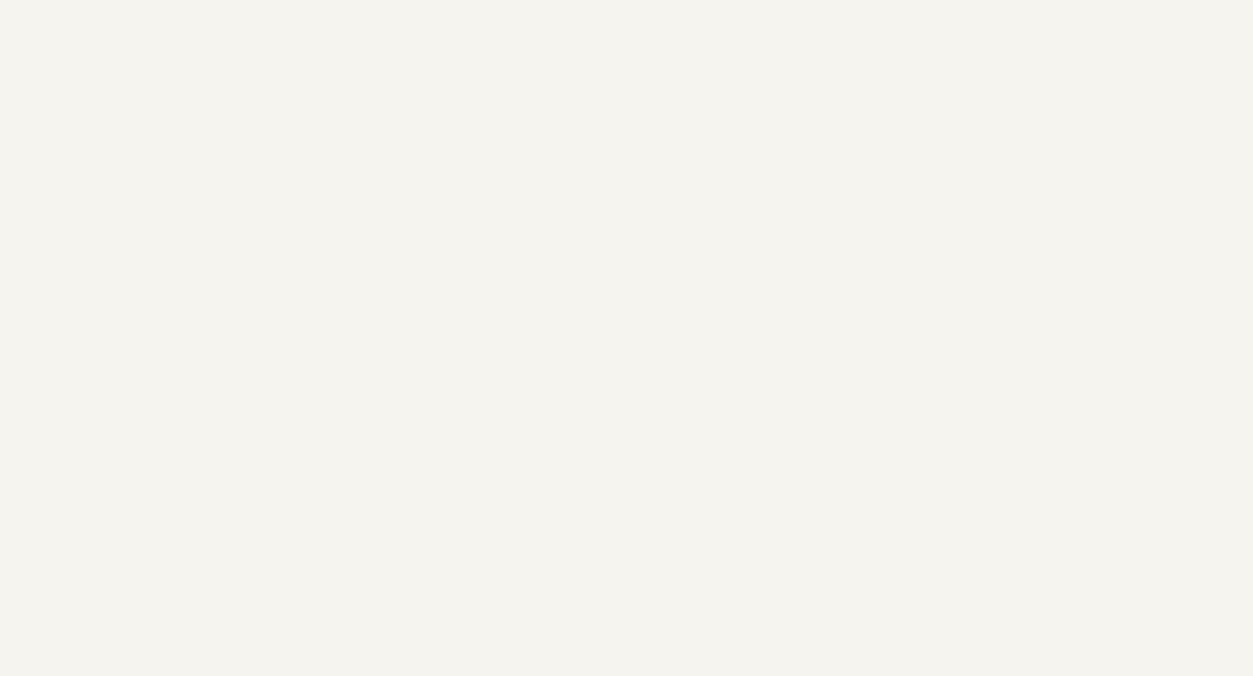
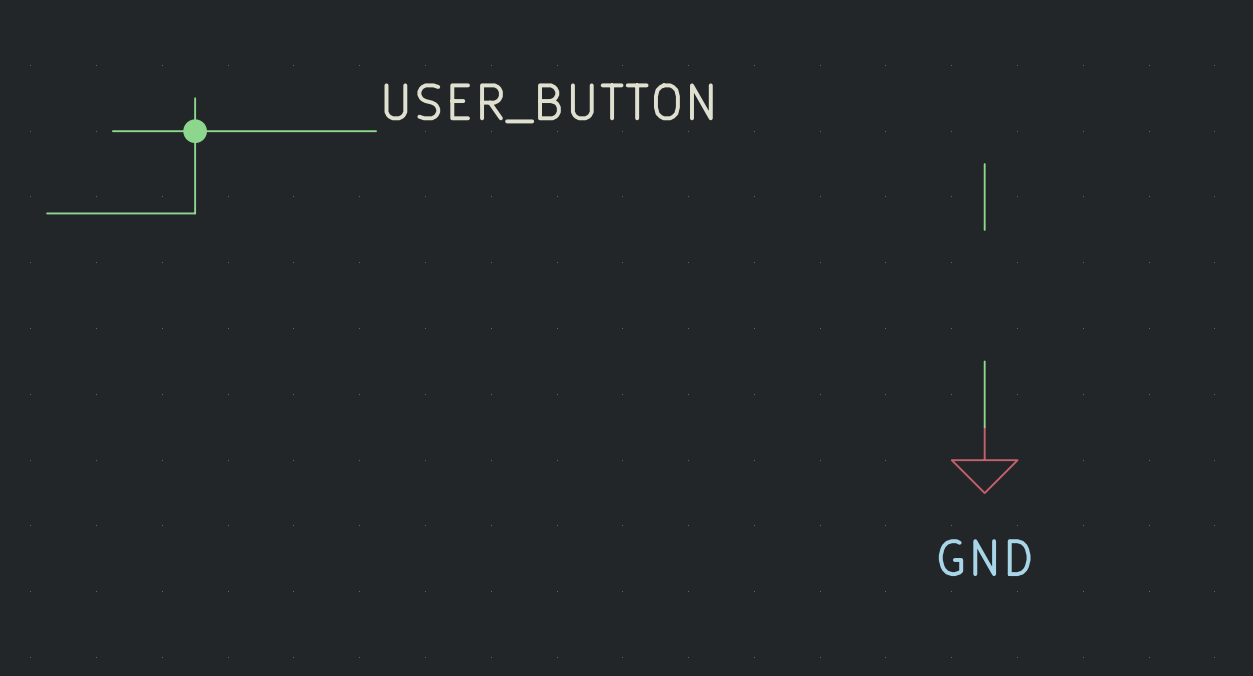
wire: none -> (195, 98) (195, 213) (47, 213)
label: none -> USER_BUTTON (548, 103)
wire: none -> (112, 131) (376, 131)
junction: none -> (195, 131)
wire: none -> (984, 164) (984, 229)
wire: none -> (984, 361) (984, 427)
power symbol: none -> GND (984, 460)

